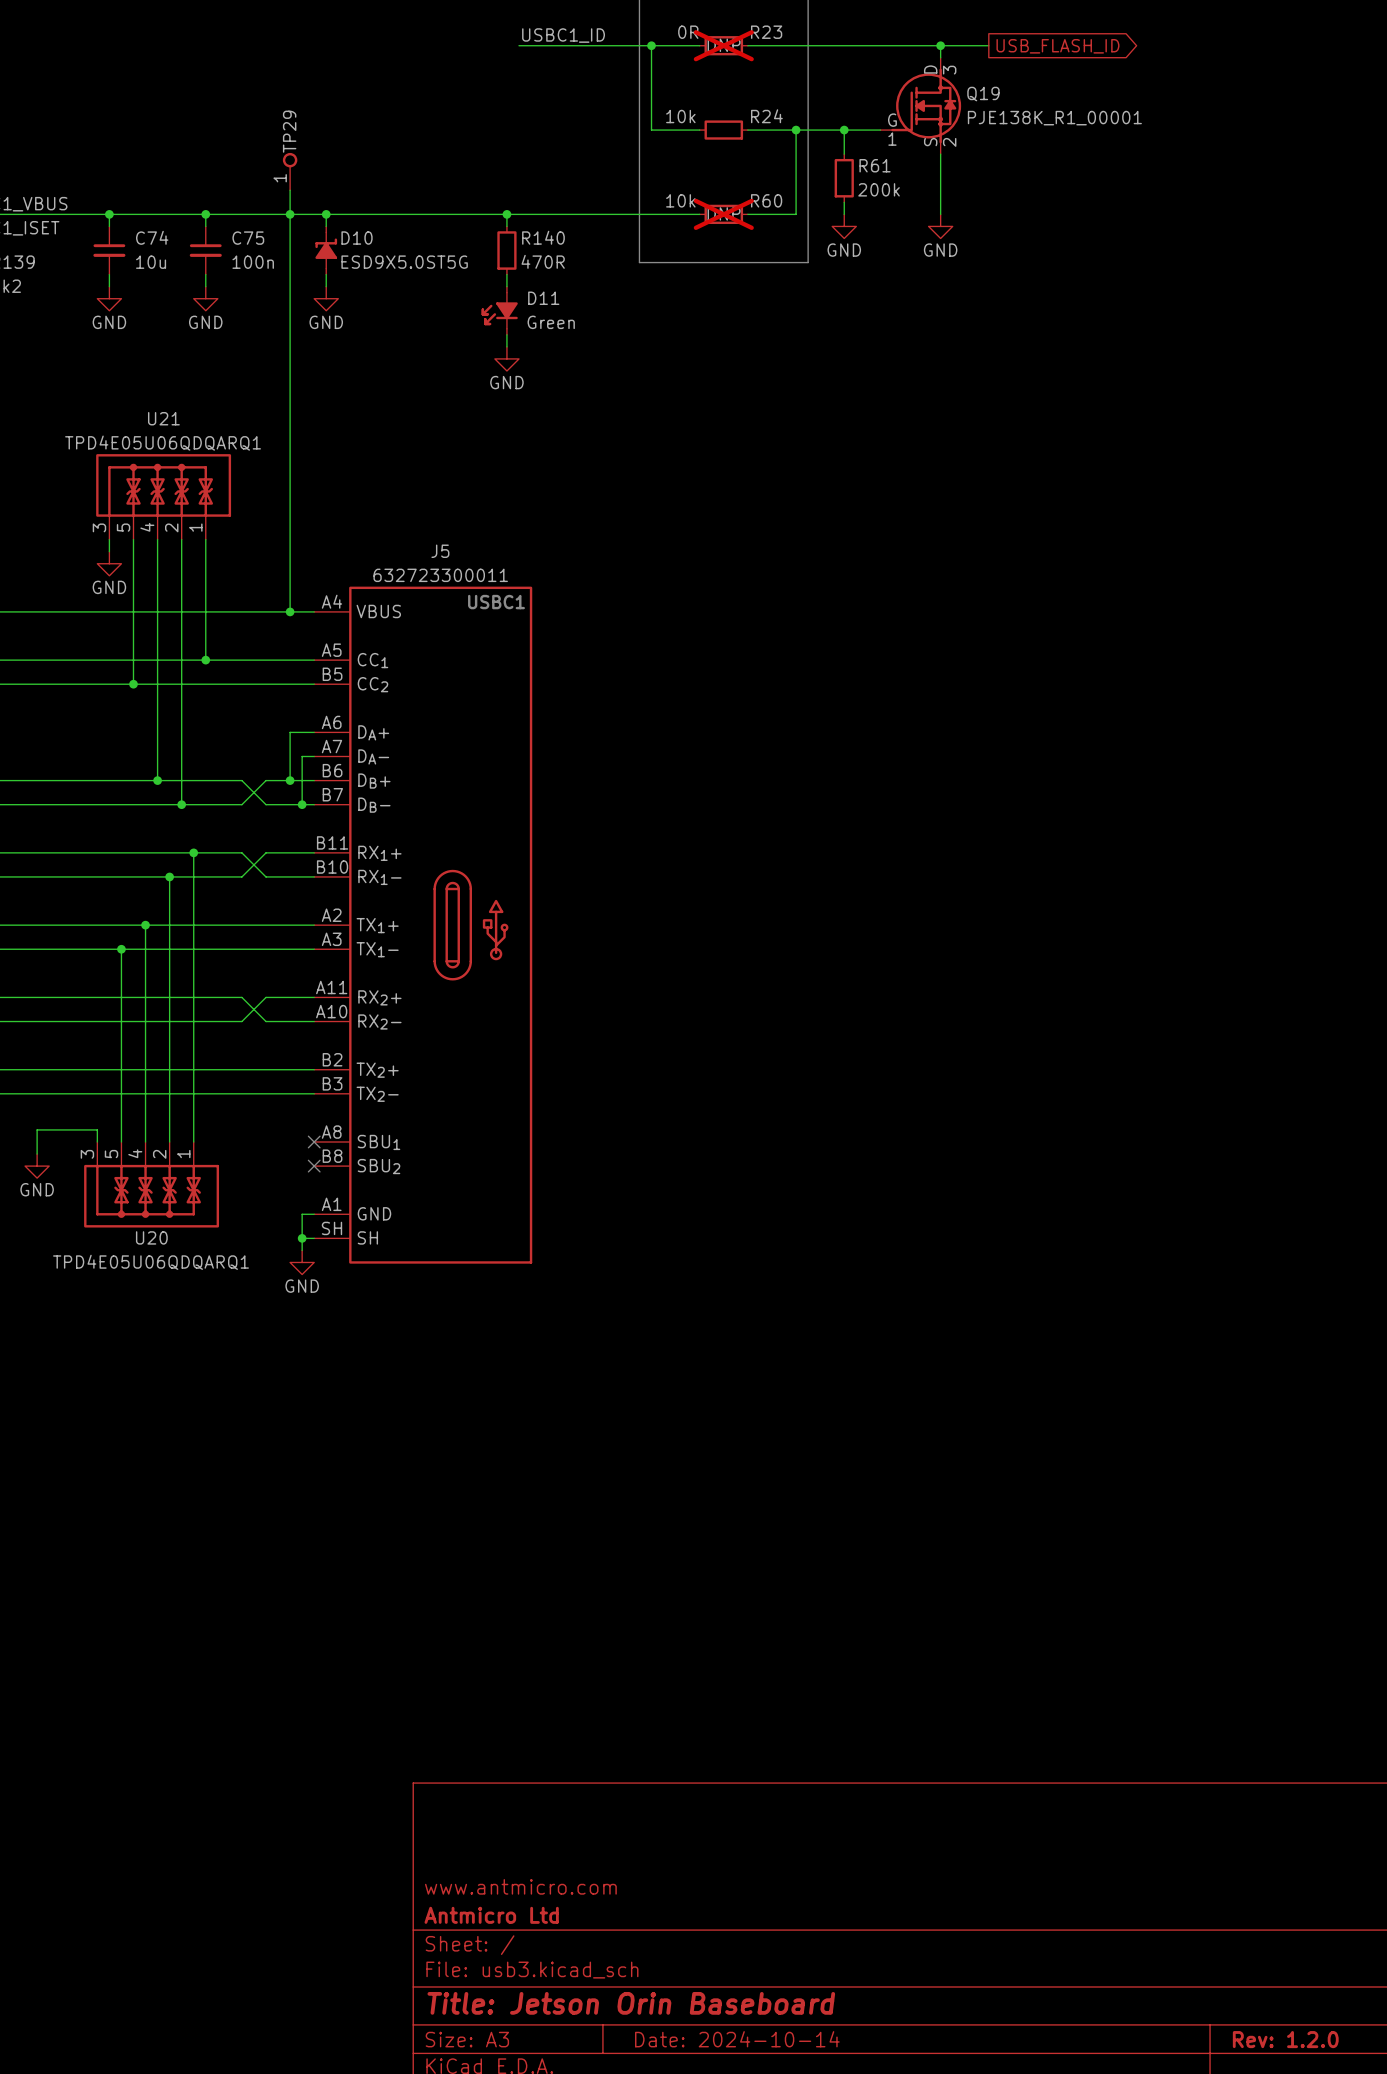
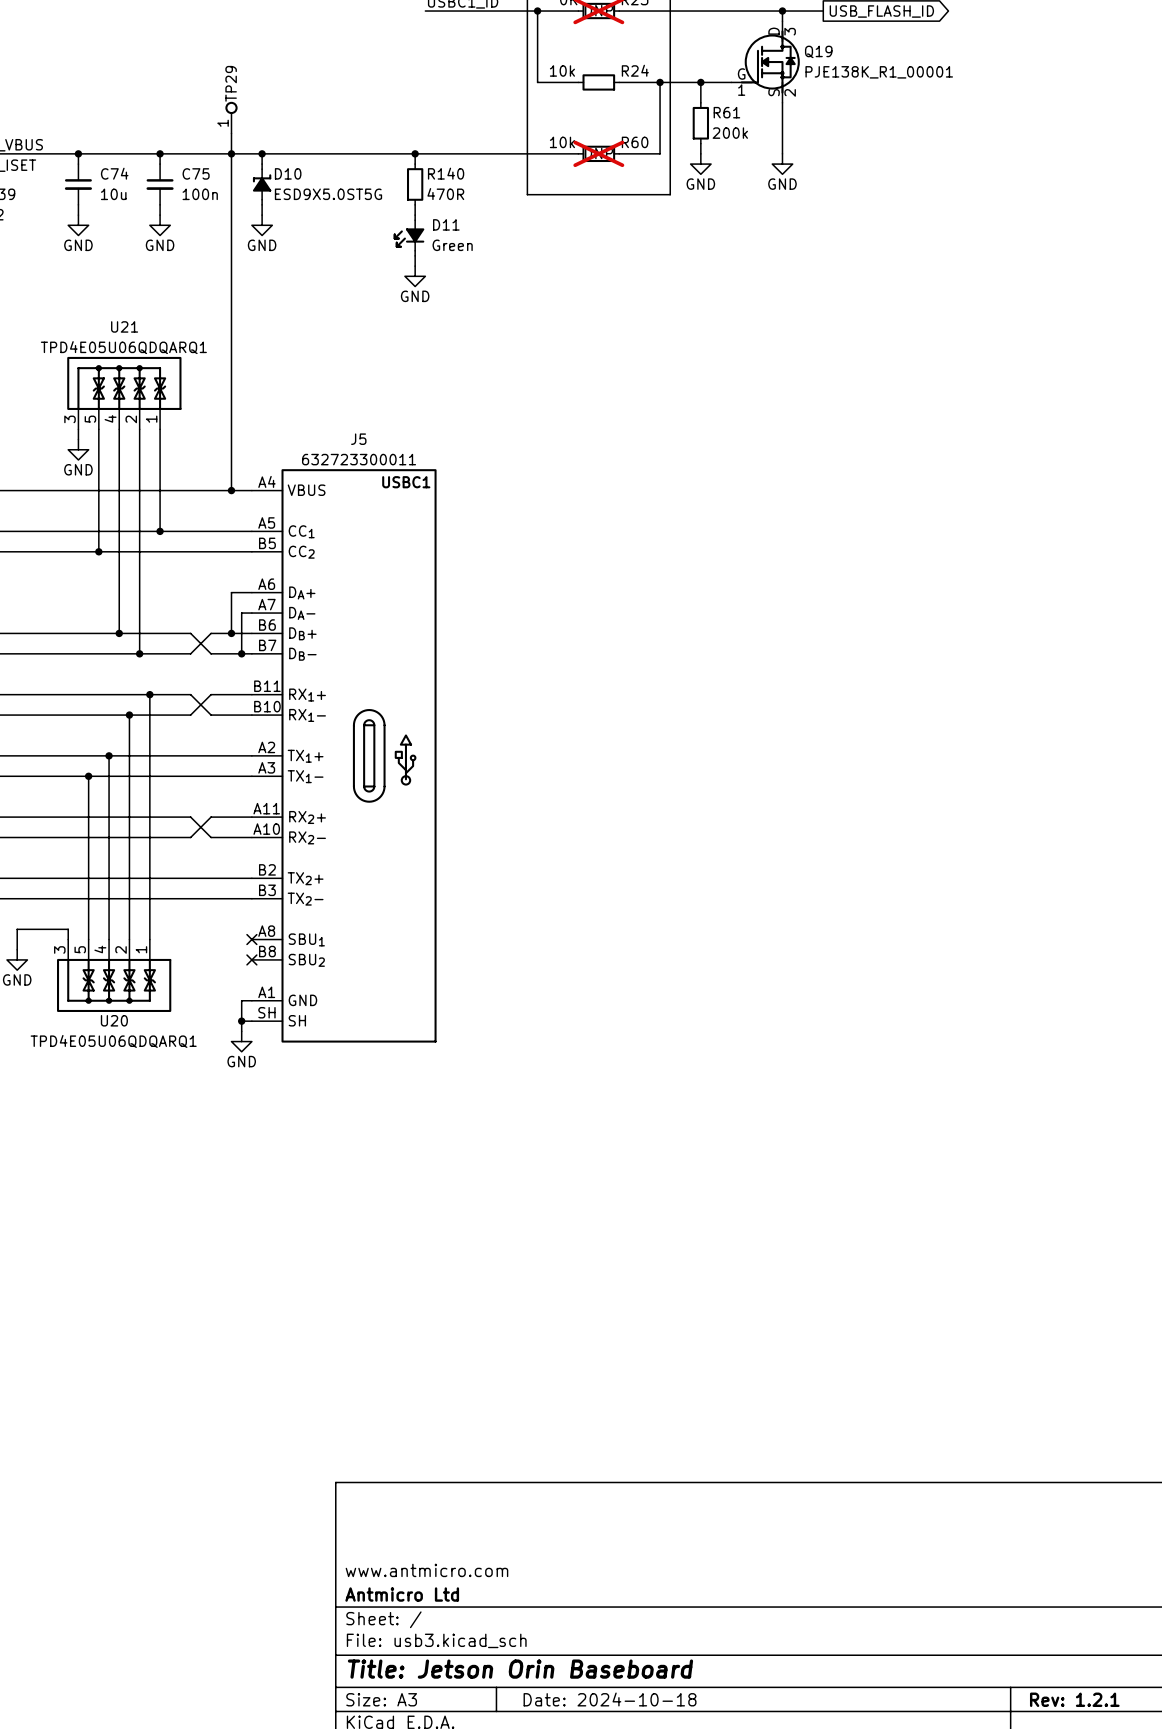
title block: Date: 2024-10-14 (737, 2039) -> Date: 2024-10-18 (610, 1699)
title block: Rev: 1.2.0 (1285, 2039) -> Rev: 1.2.1 (1074, 1699)

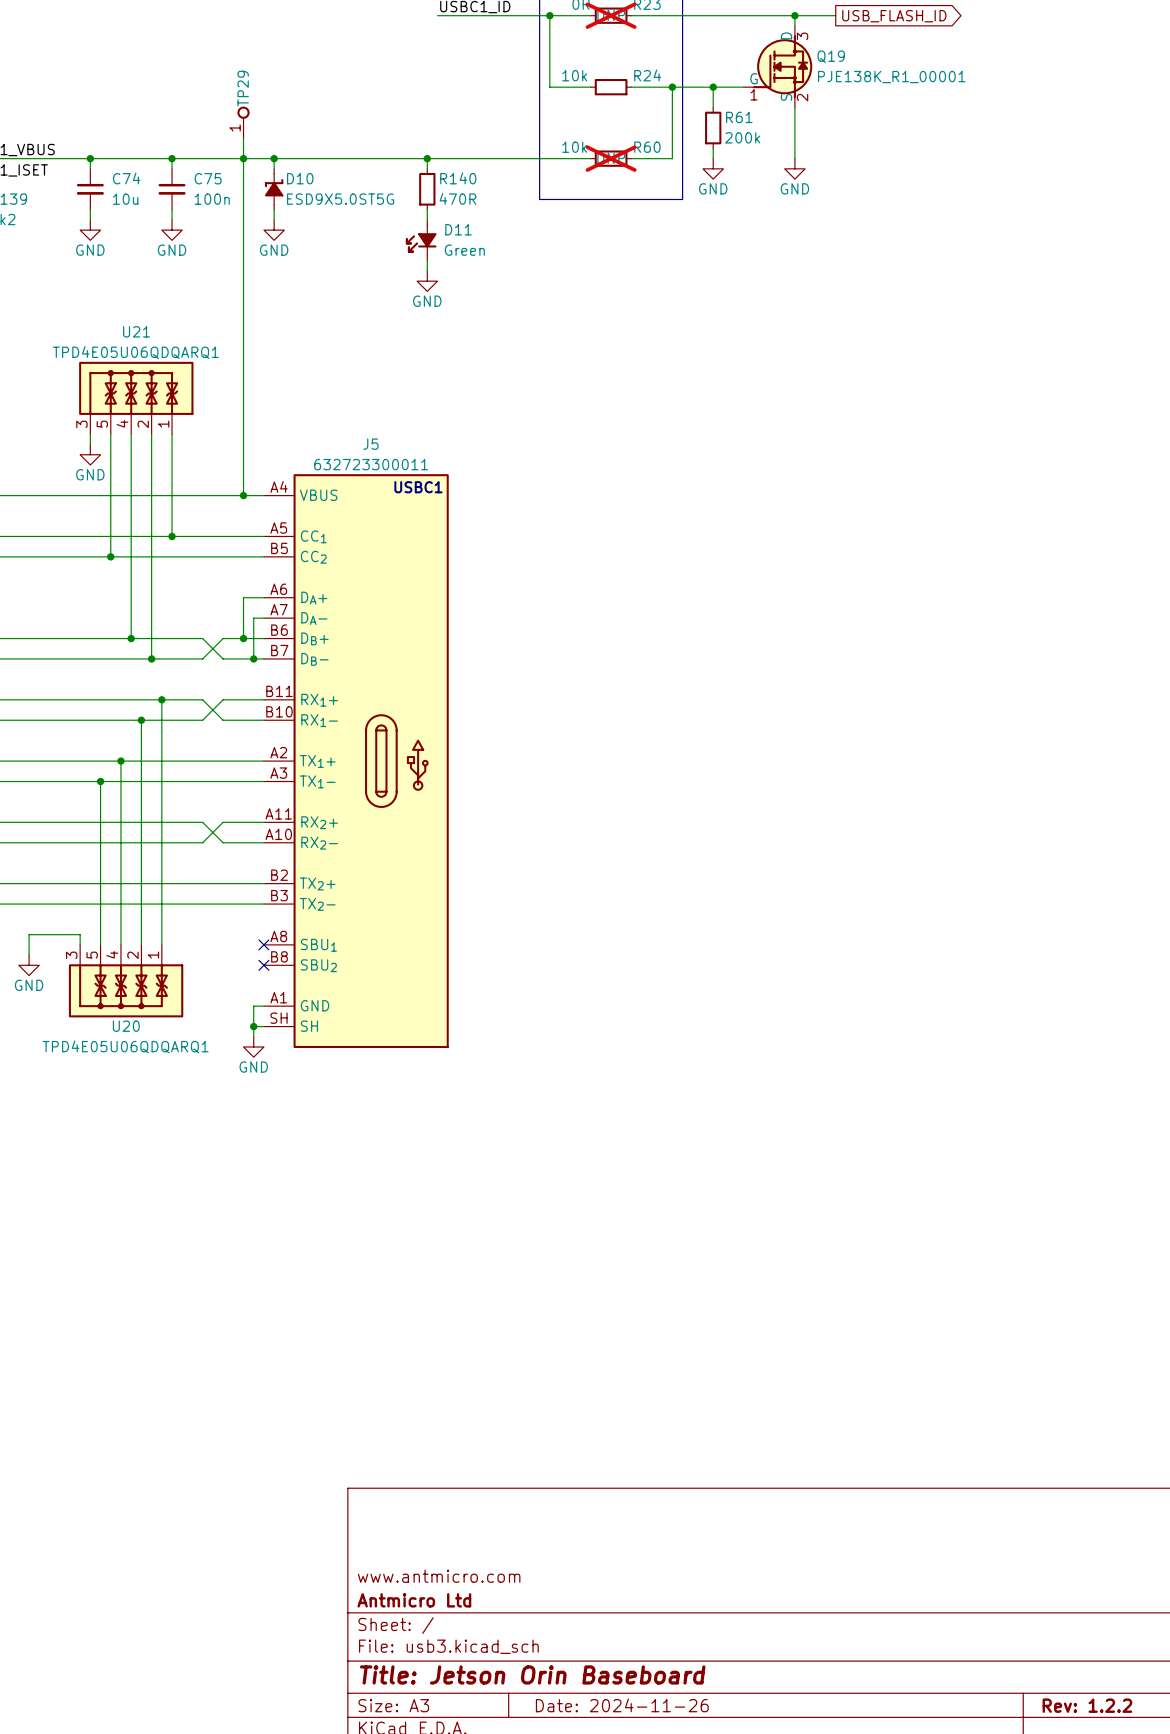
title block: Date: 2024-10-18 (610, 1699) -> Date: 2024-11-26 (622, 1705)
title block: Rev: 1.2.1 (1074, 1699) -> Rev: 1.2.2 (1087, 1705)

